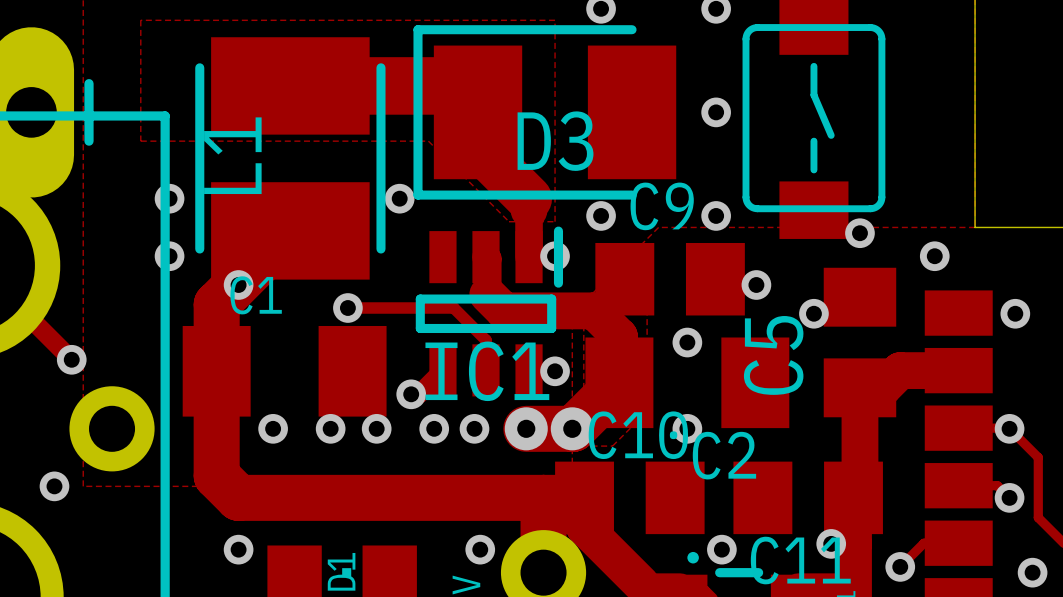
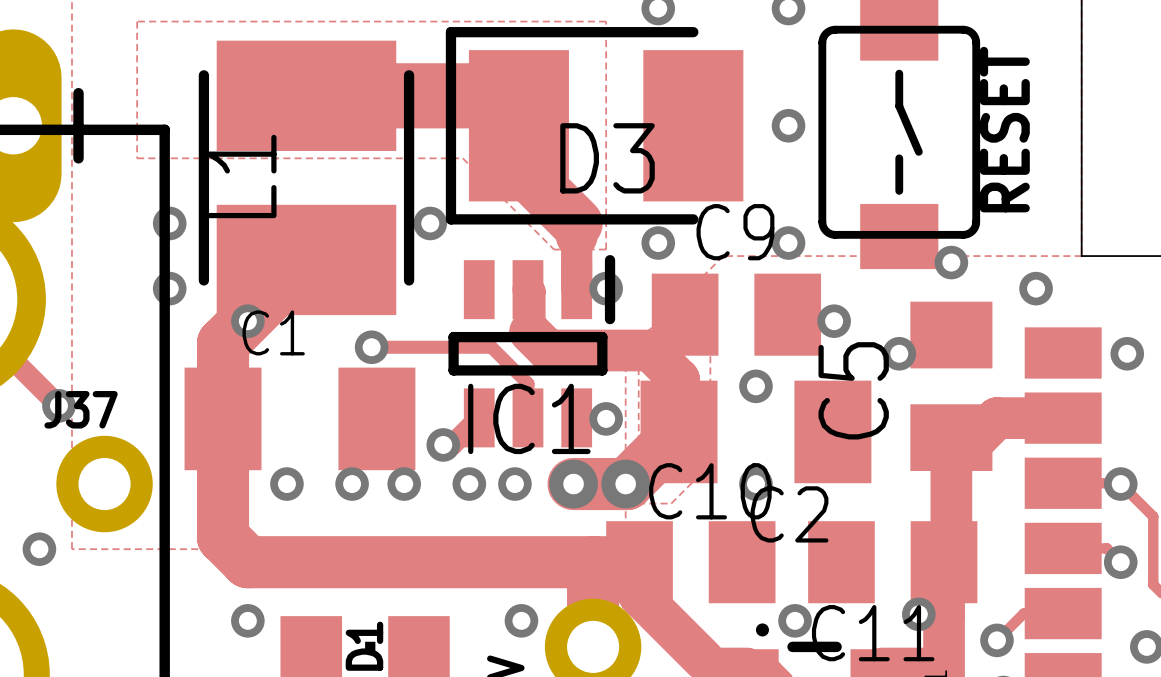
RESET name: none -> RESET (1004, 129)
J37 name: none -> J37 (81, 409)

